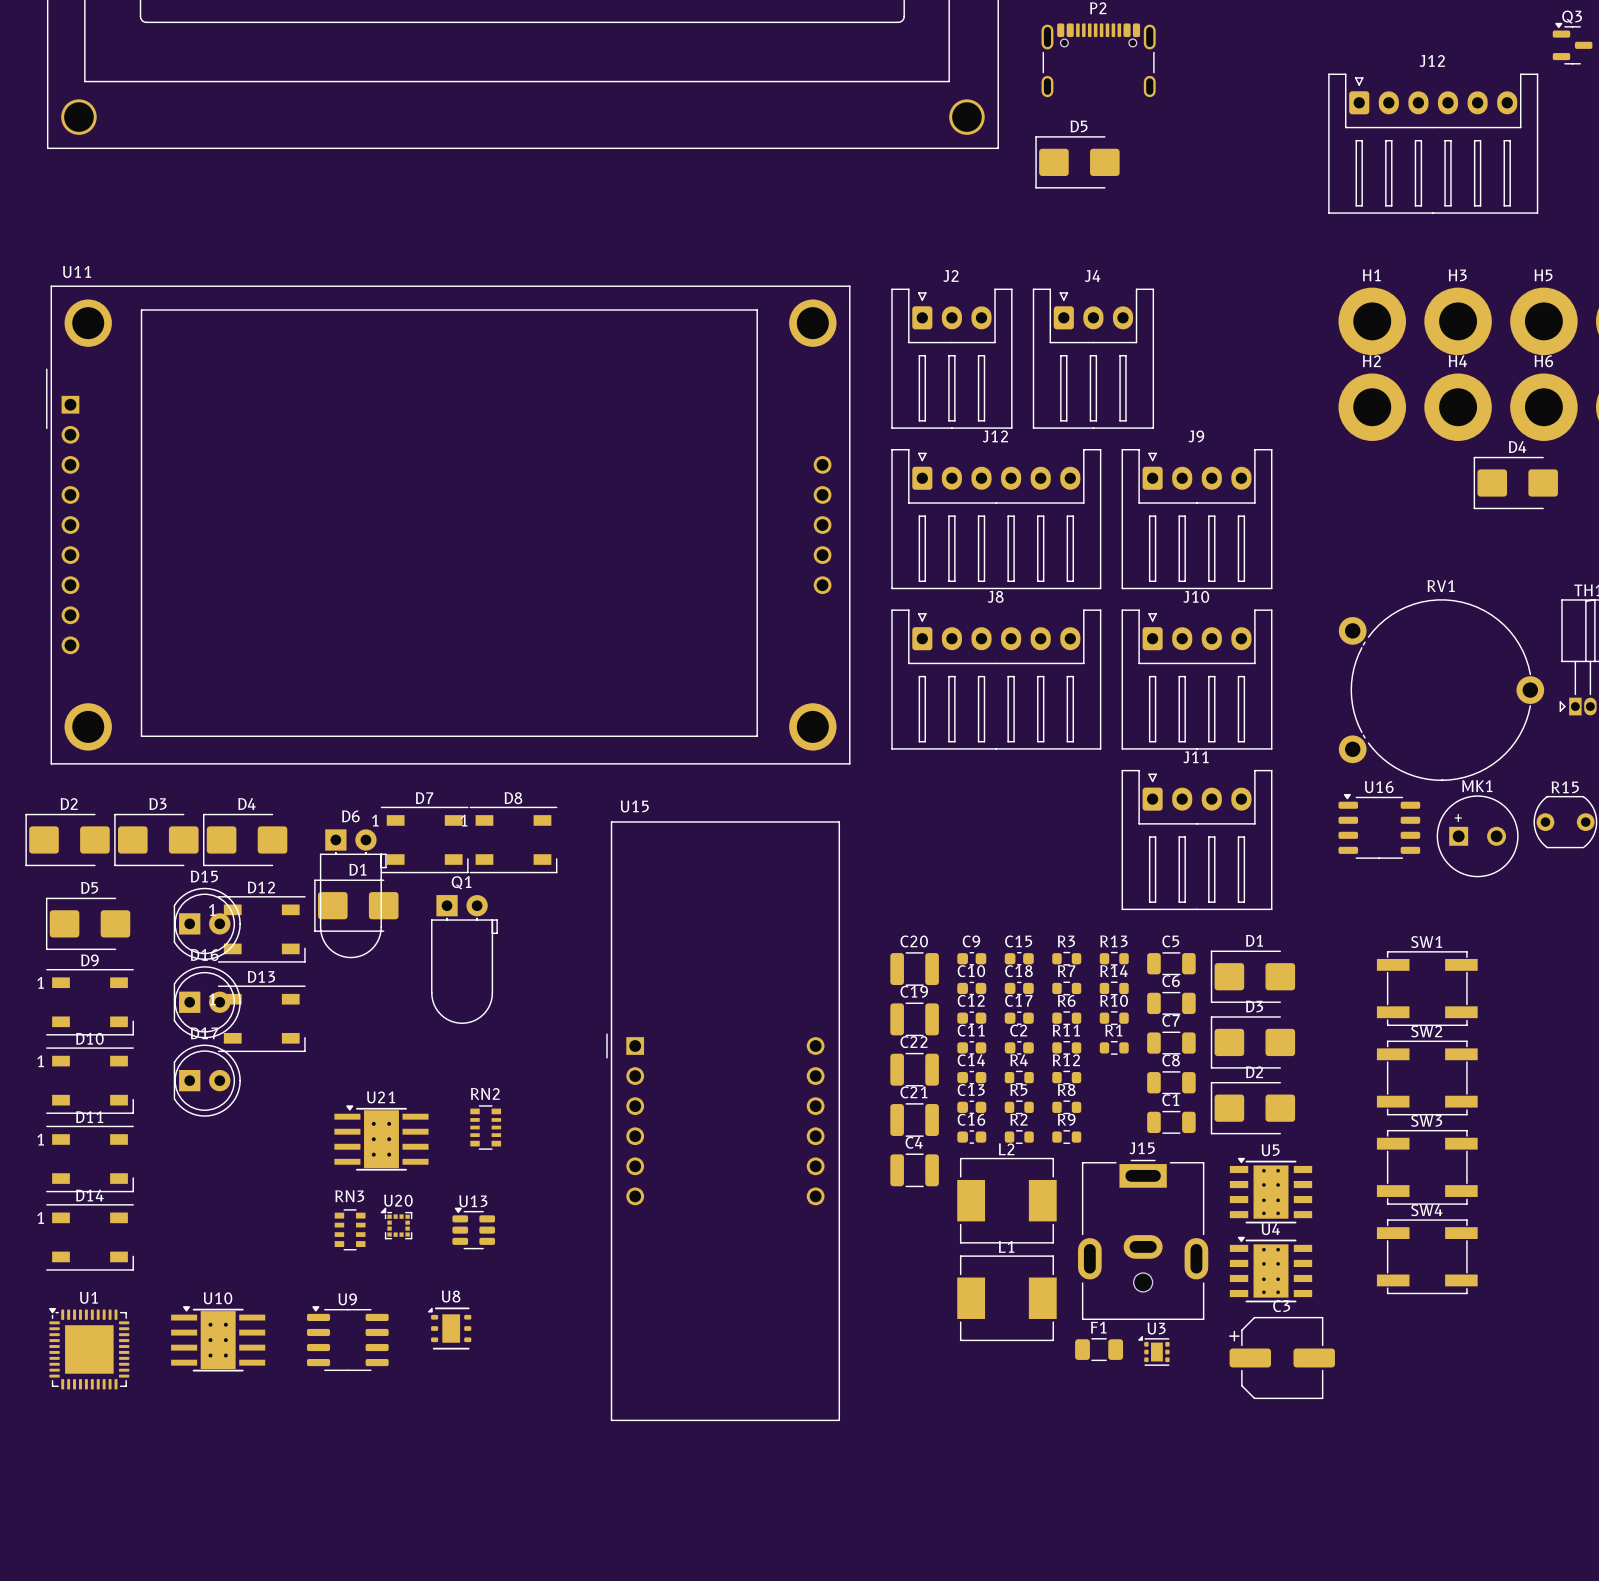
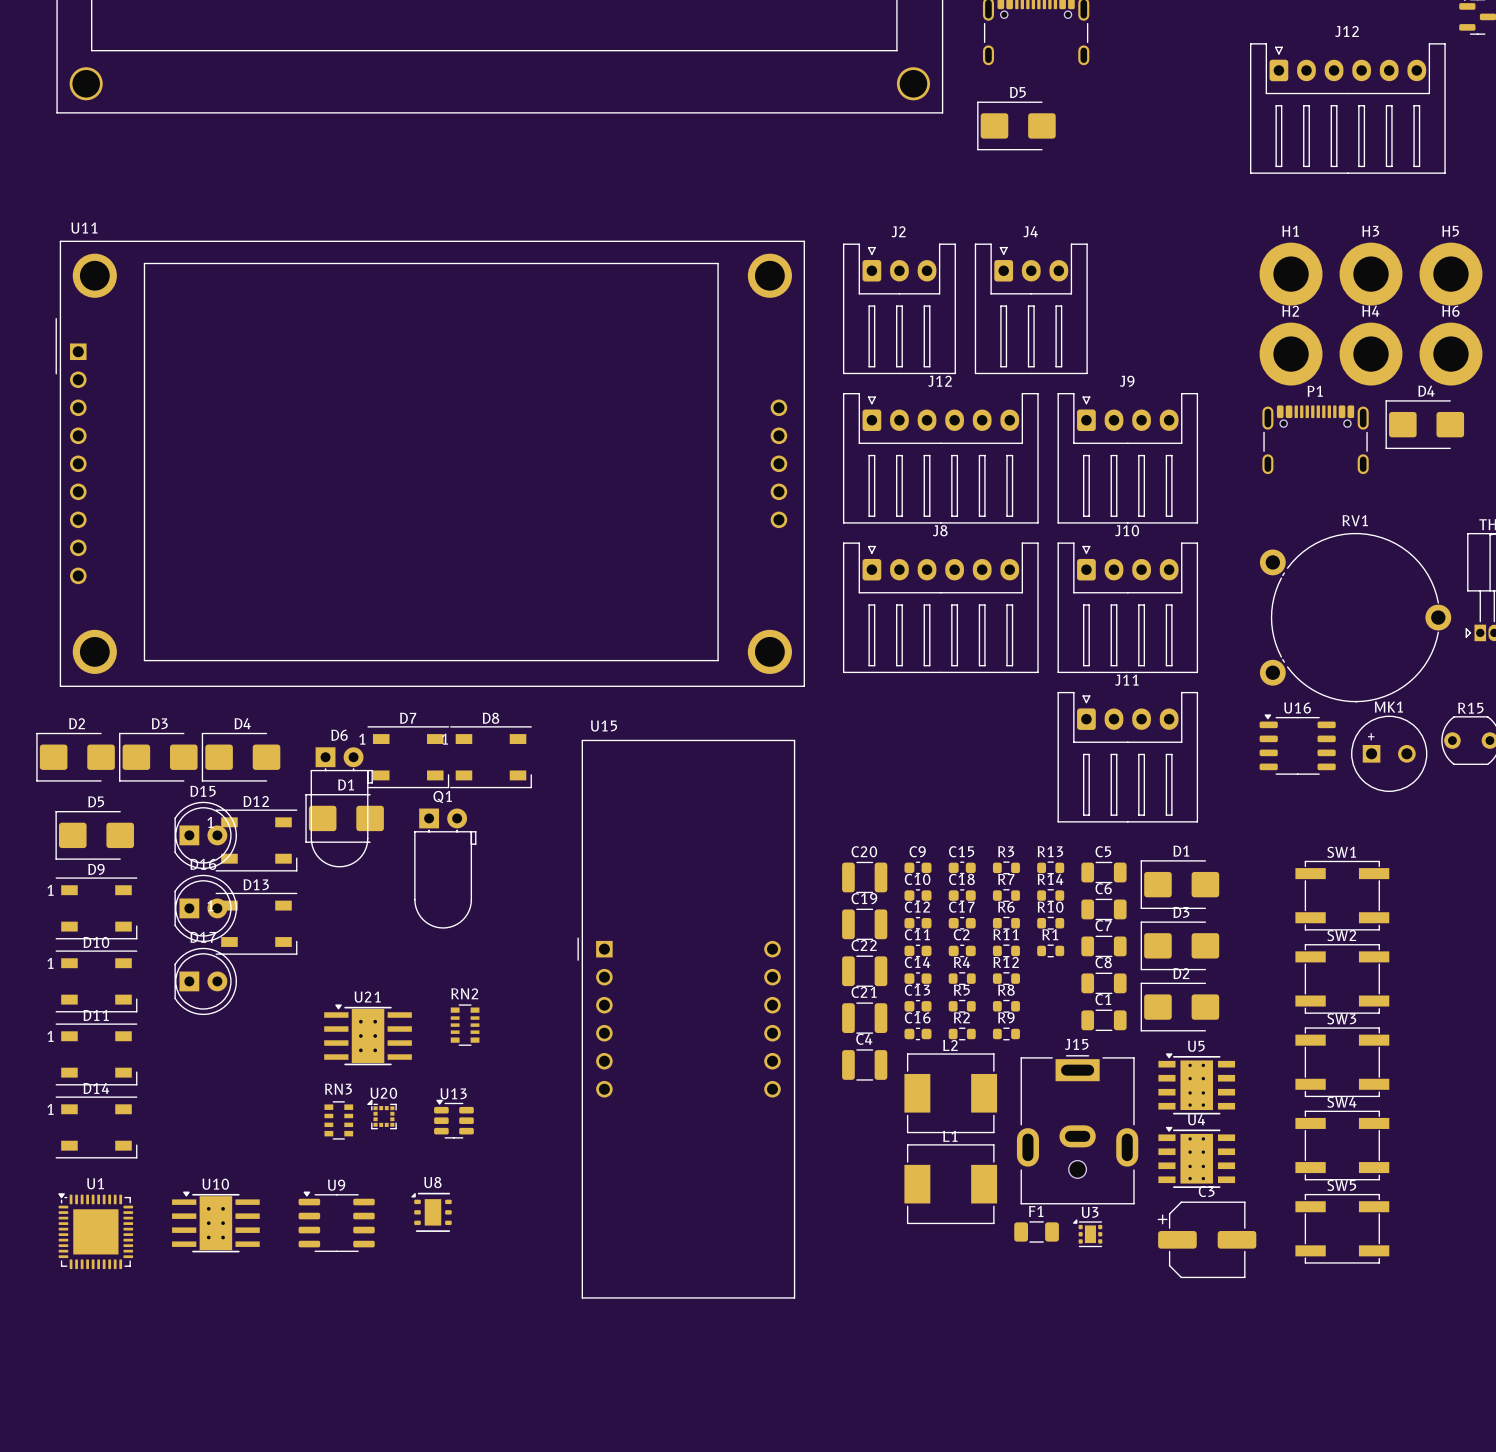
P1: none -> (1315, 439)
SW5: none -> (1342, 1228)

